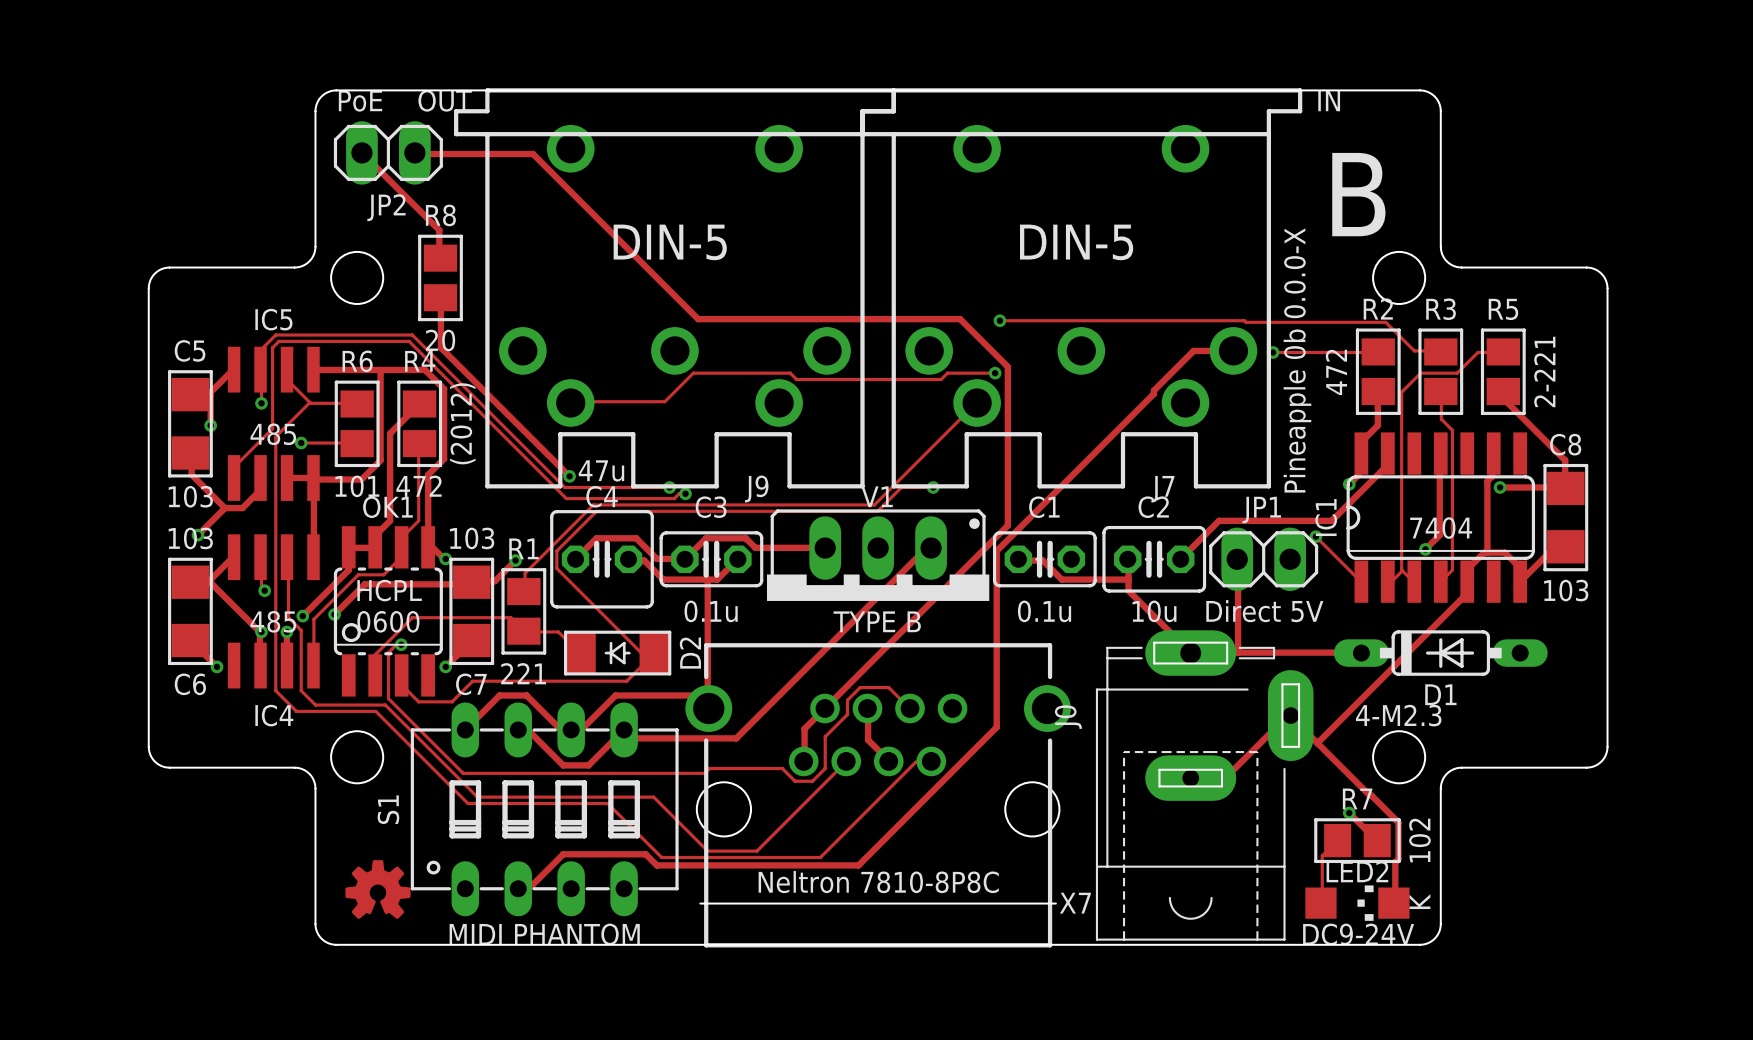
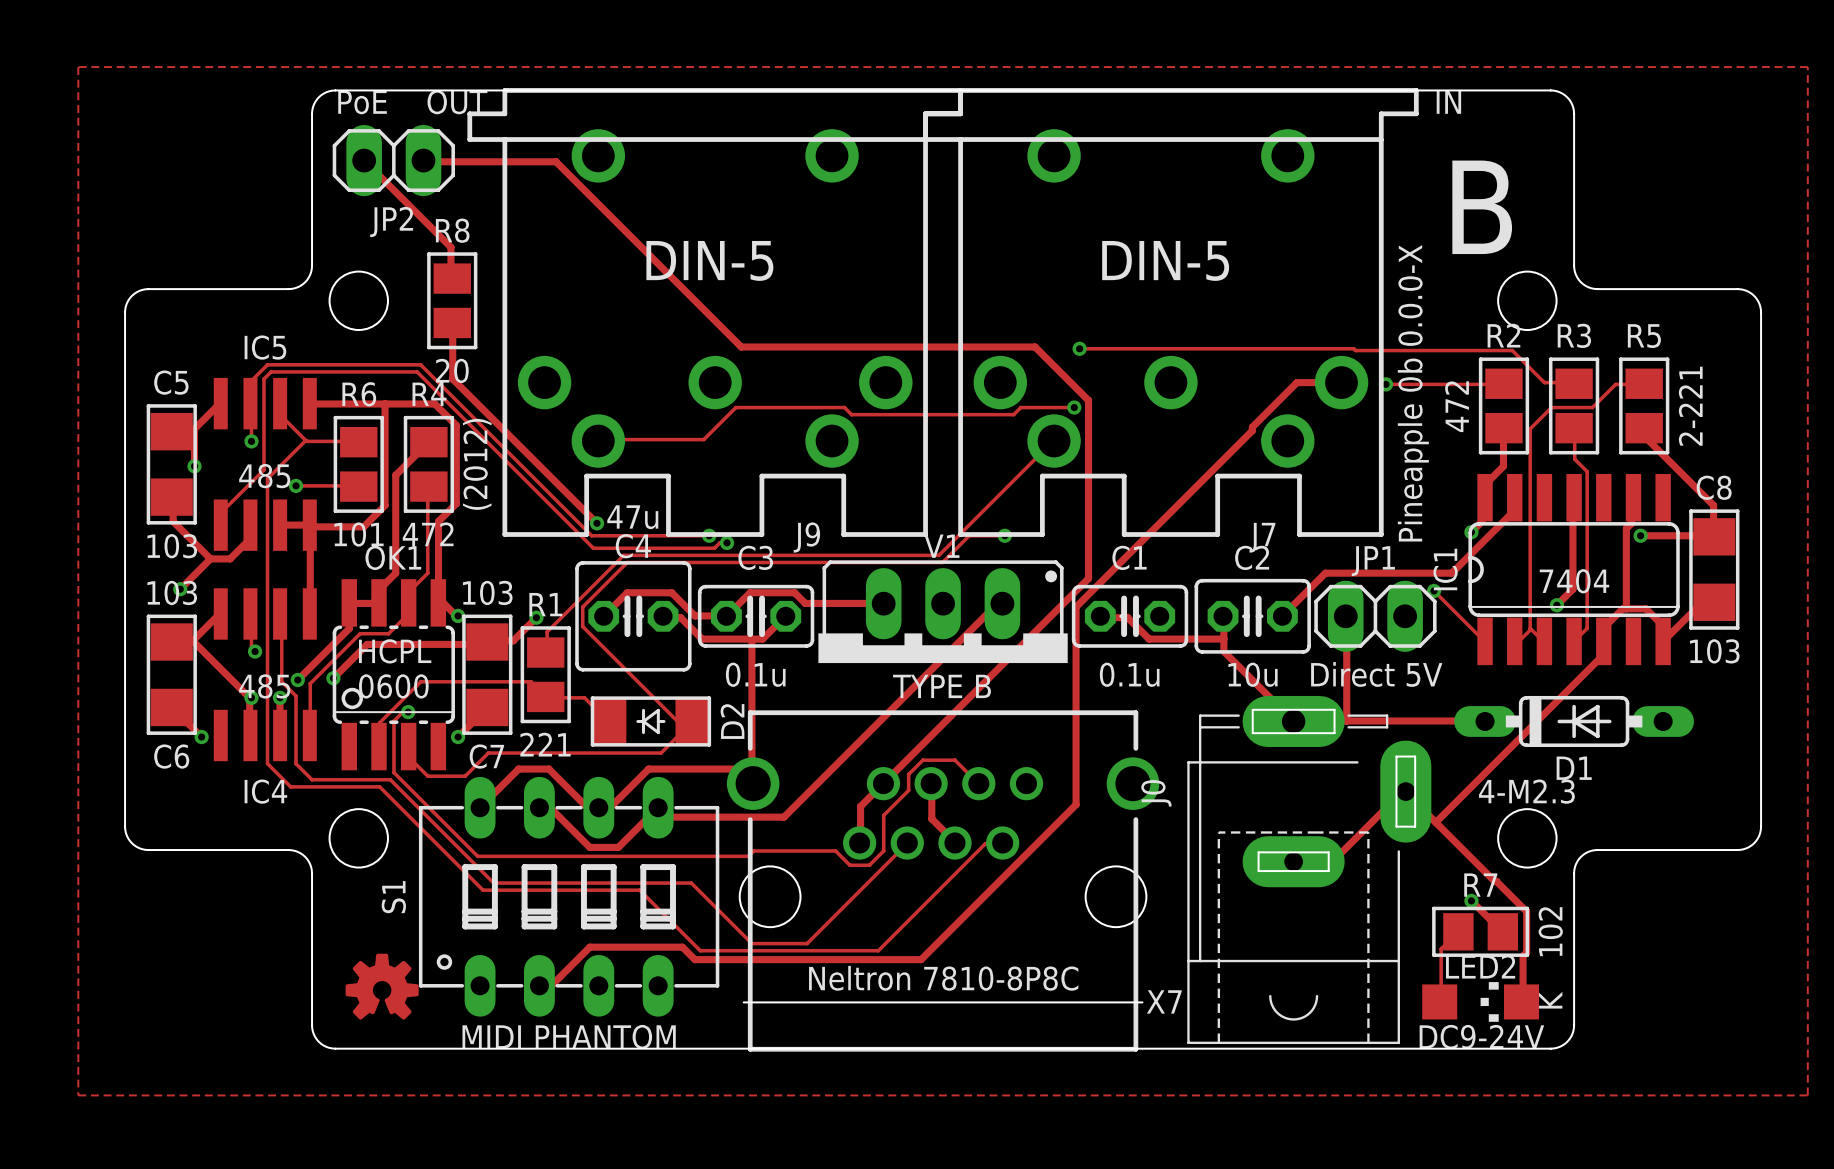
zone outline: none -> (78, 67) (1807, 67) (1807, 1095) (78, 1095) (78, 67)

